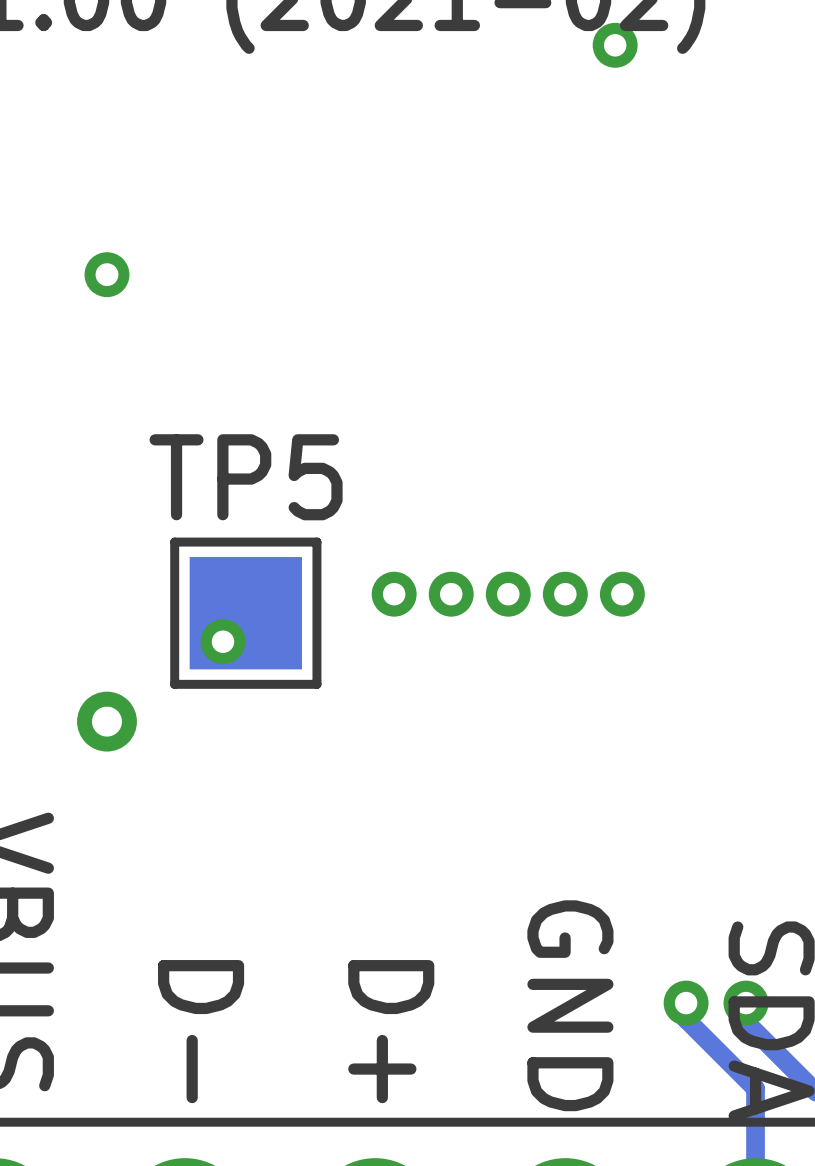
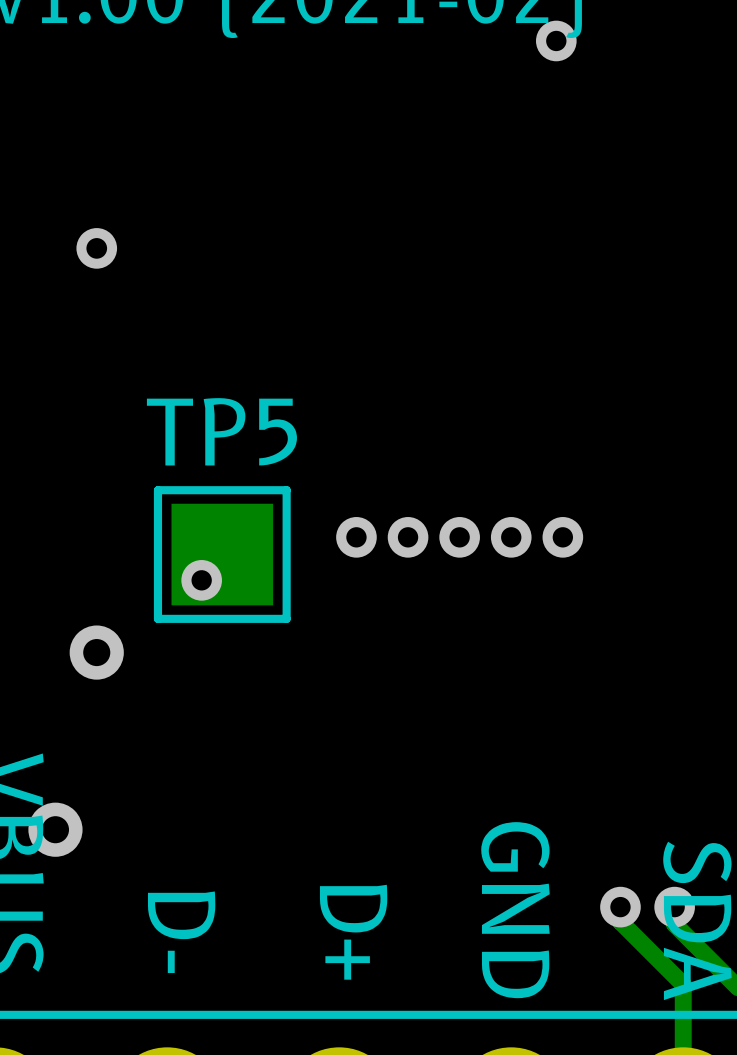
via: none -> (55, 829)

